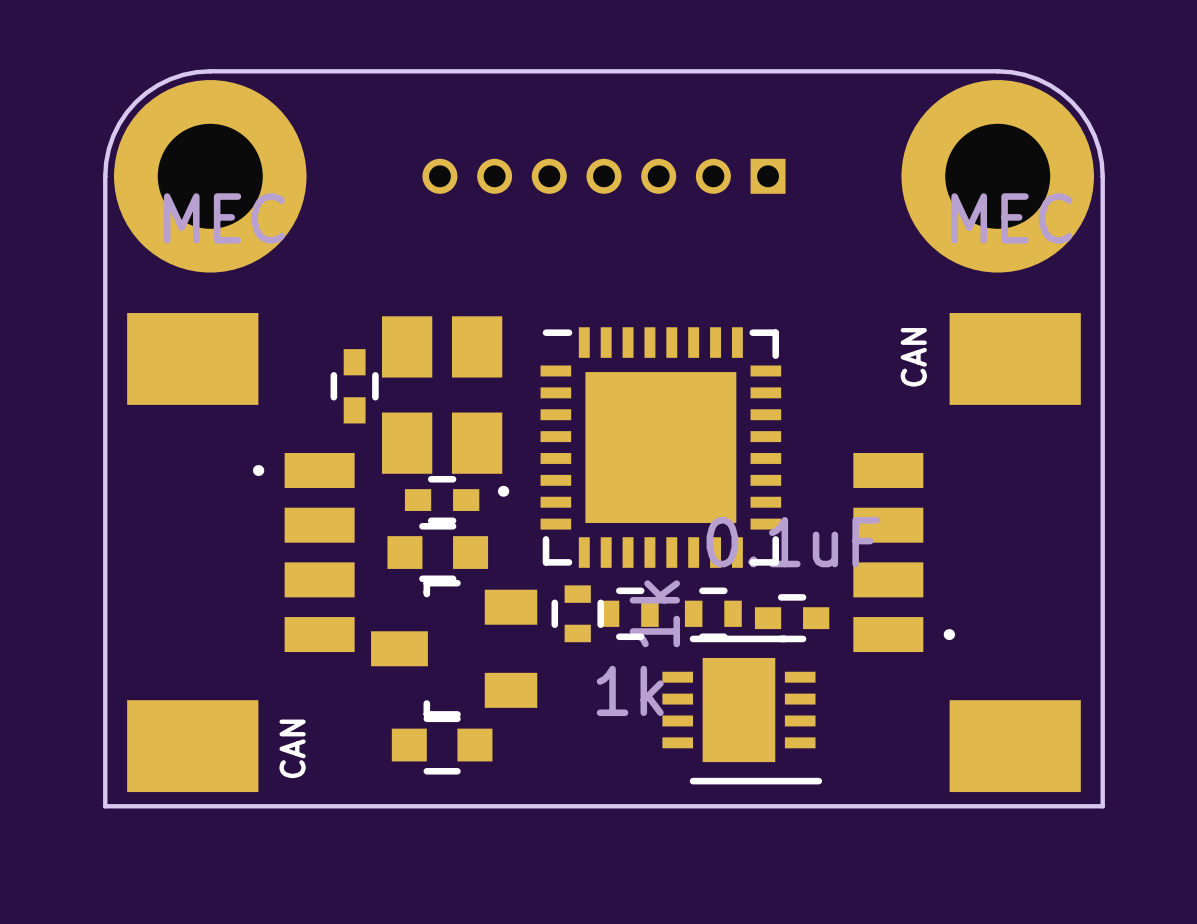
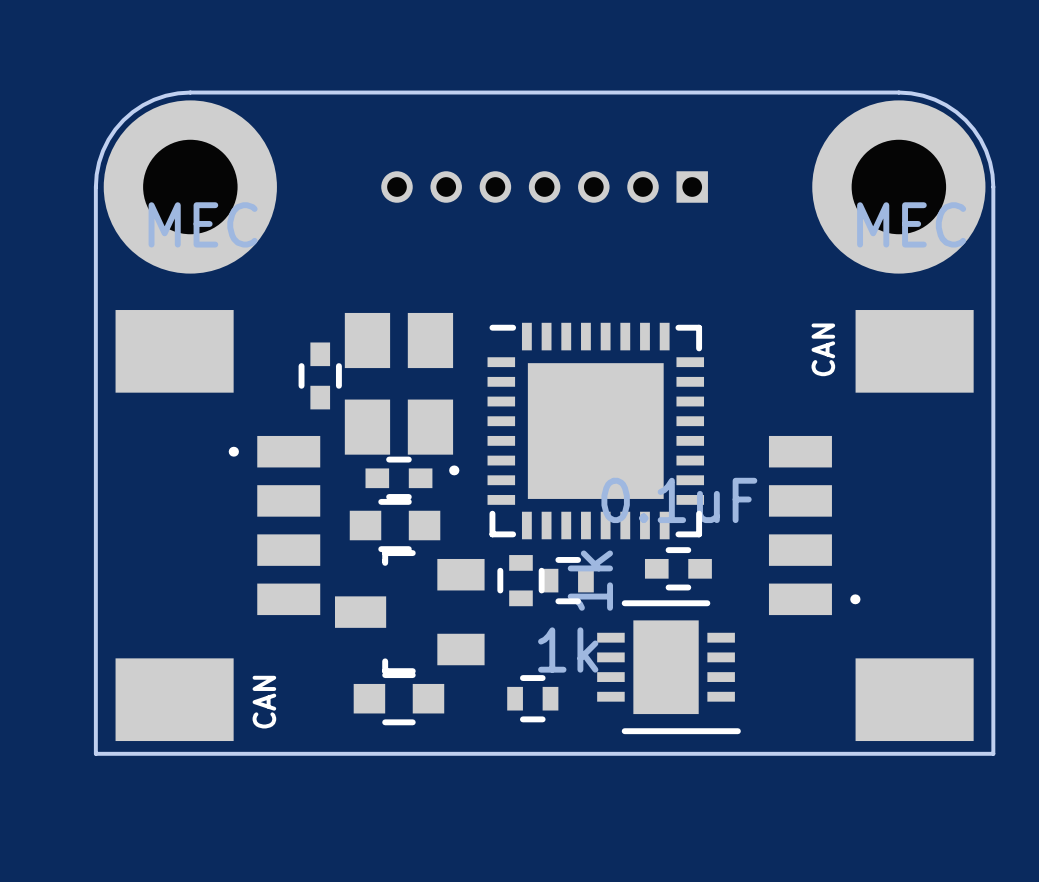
part position: (713, 613) -> (532, 698)
part position: (792, 618) -> (678, 568)

